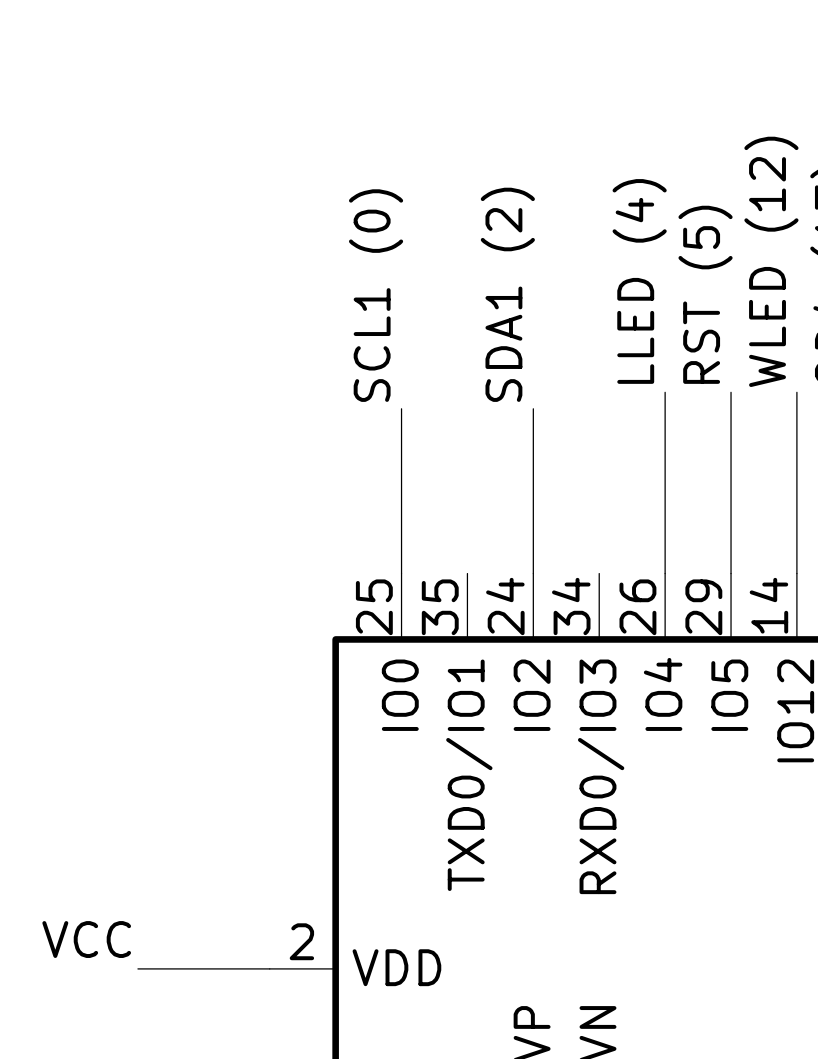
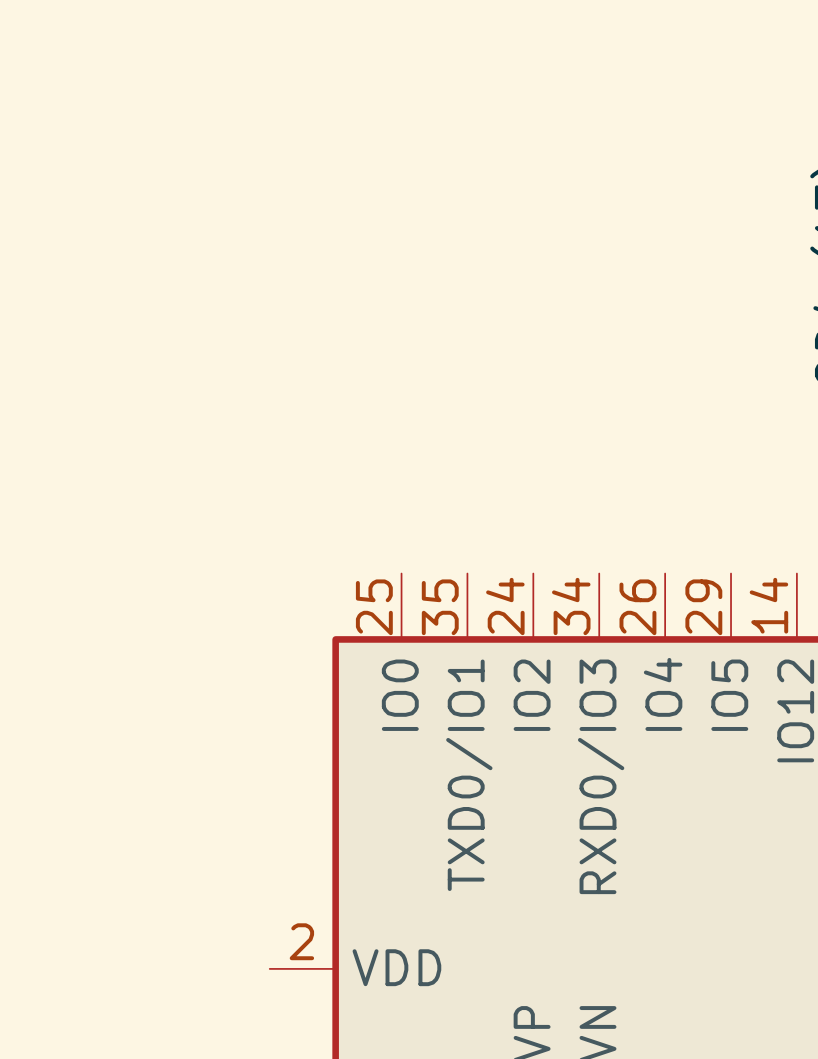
label: WLED (12) (771, 261) -> none
label: LLED (4) (639, 281) -> none
label: SDA1 (2) (507, 294) -> none
label: RST (5) (705, 294) -> none
label: SCL1 (0) (376, 295) -> none
wire: (665, 392) (665, 573) -> none
wire: (731, 392) (731, 573) -> none
wire: (796, 392) (796, 573) -> none
wire: (401, 408) (401, 573) -> none
wire: (533, 408) (533, 573) -> none
label: VCC (86, 939) -> none
wire: (137, 968) (269, 968) -> none

